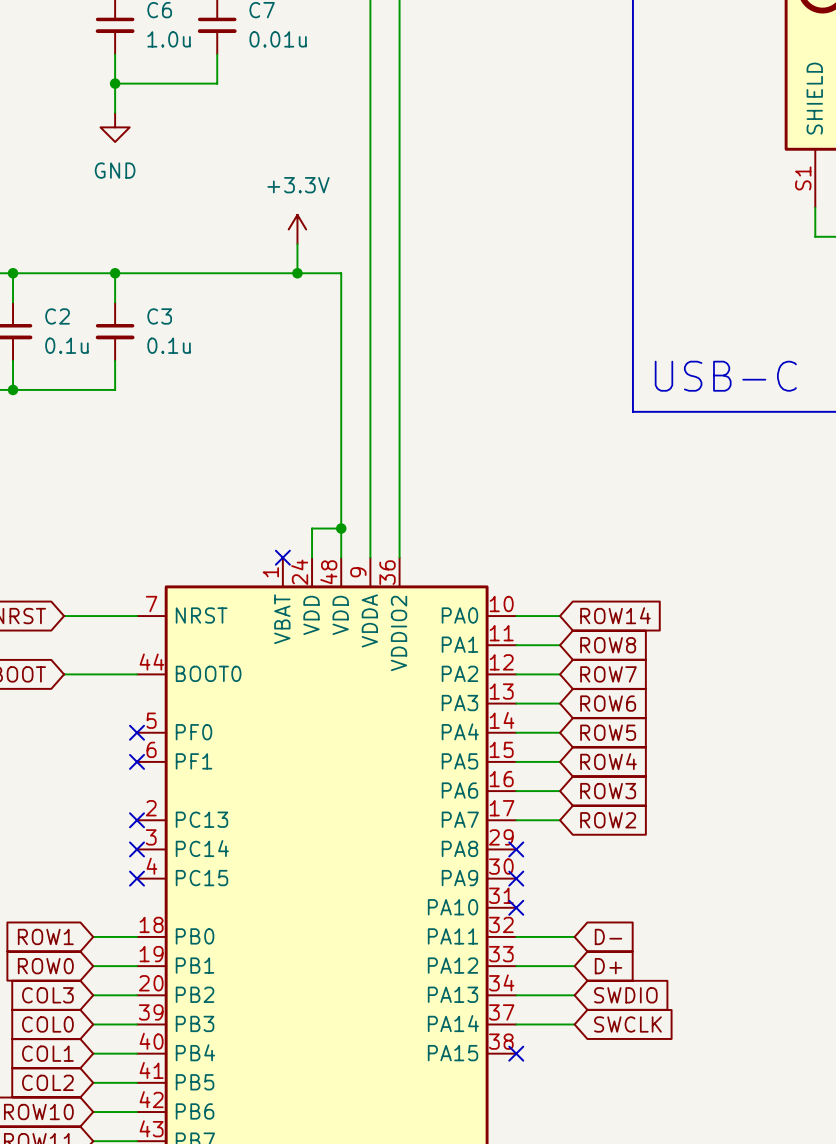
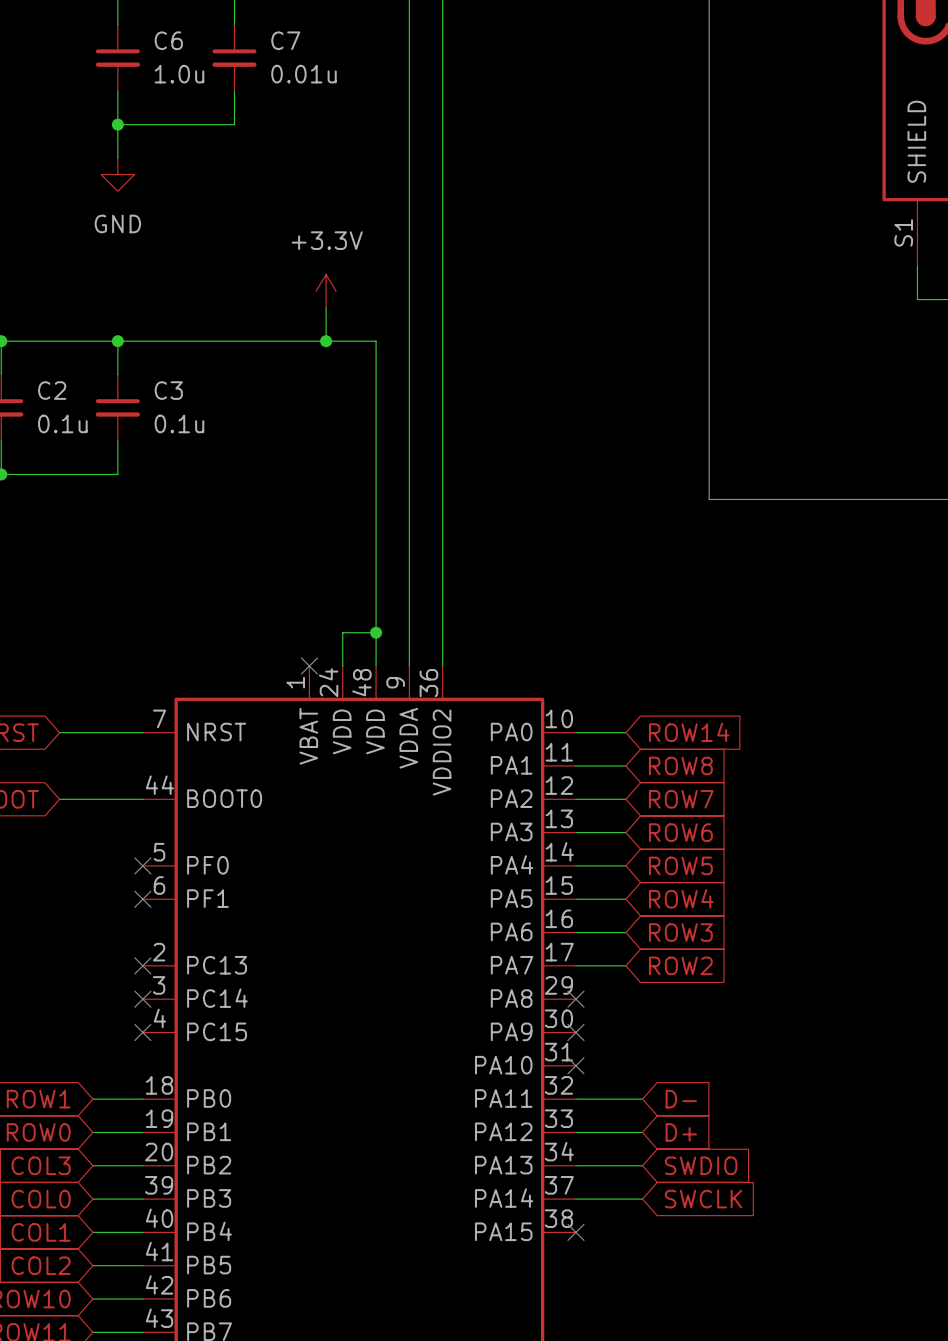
text: USB-C (725, 376) -> none

